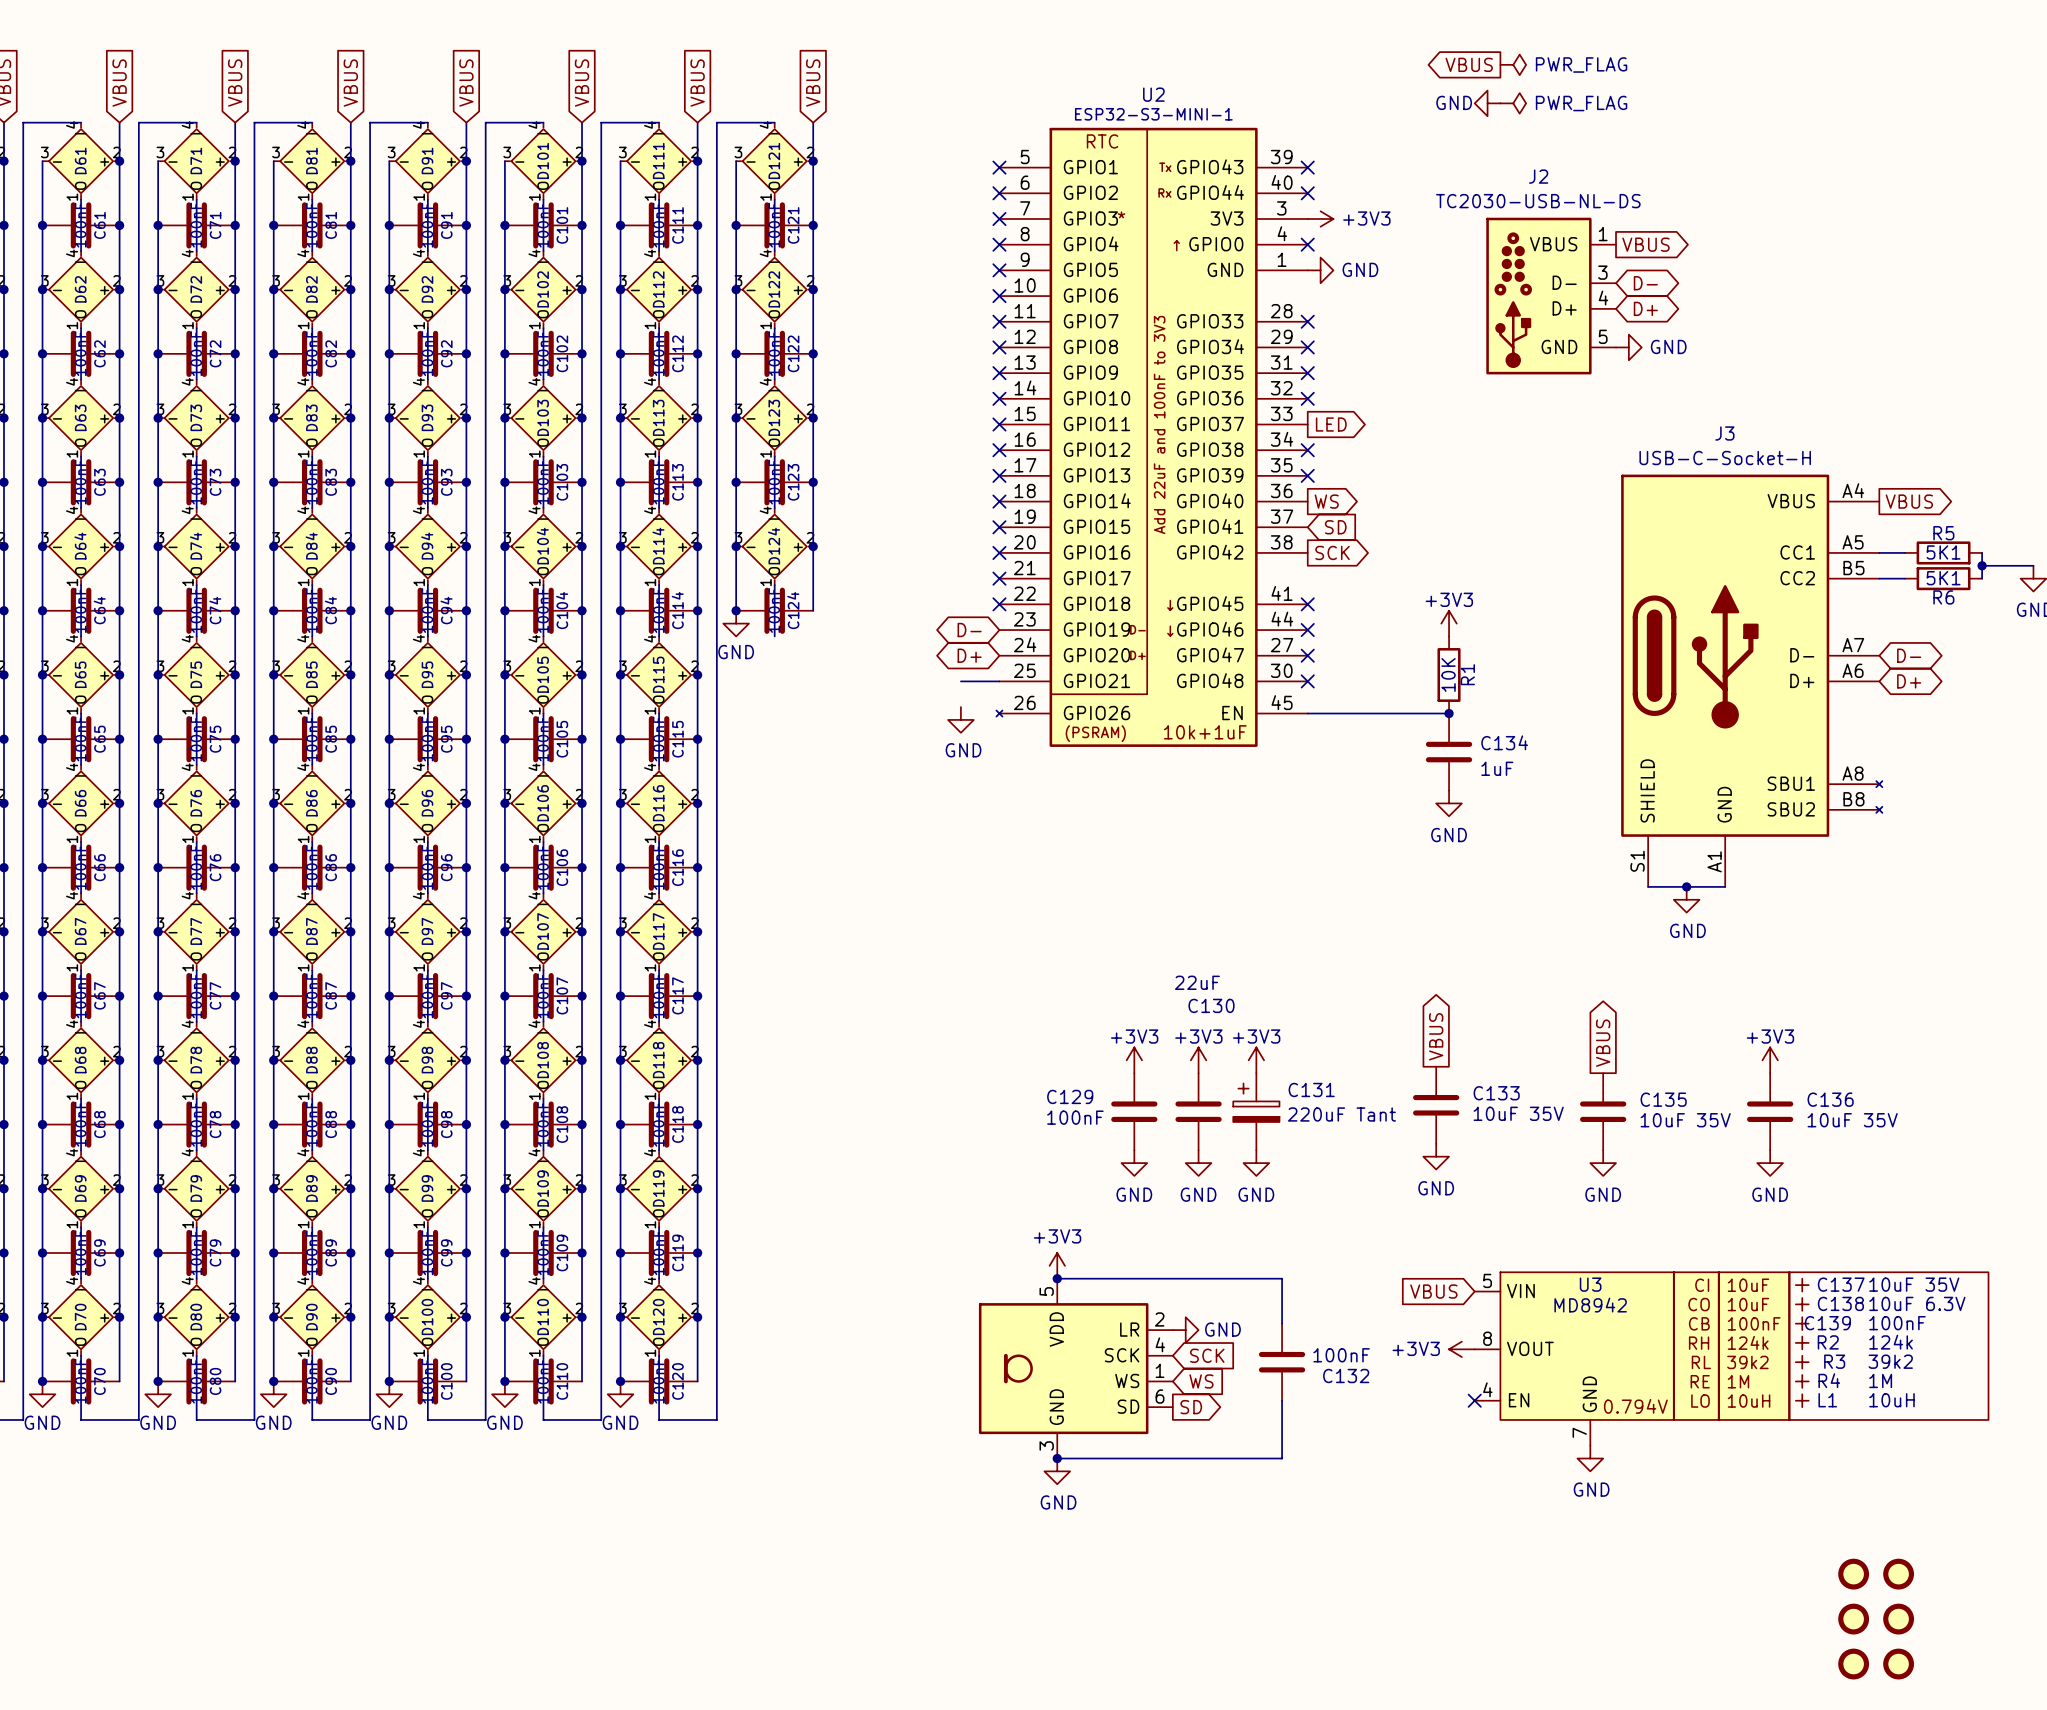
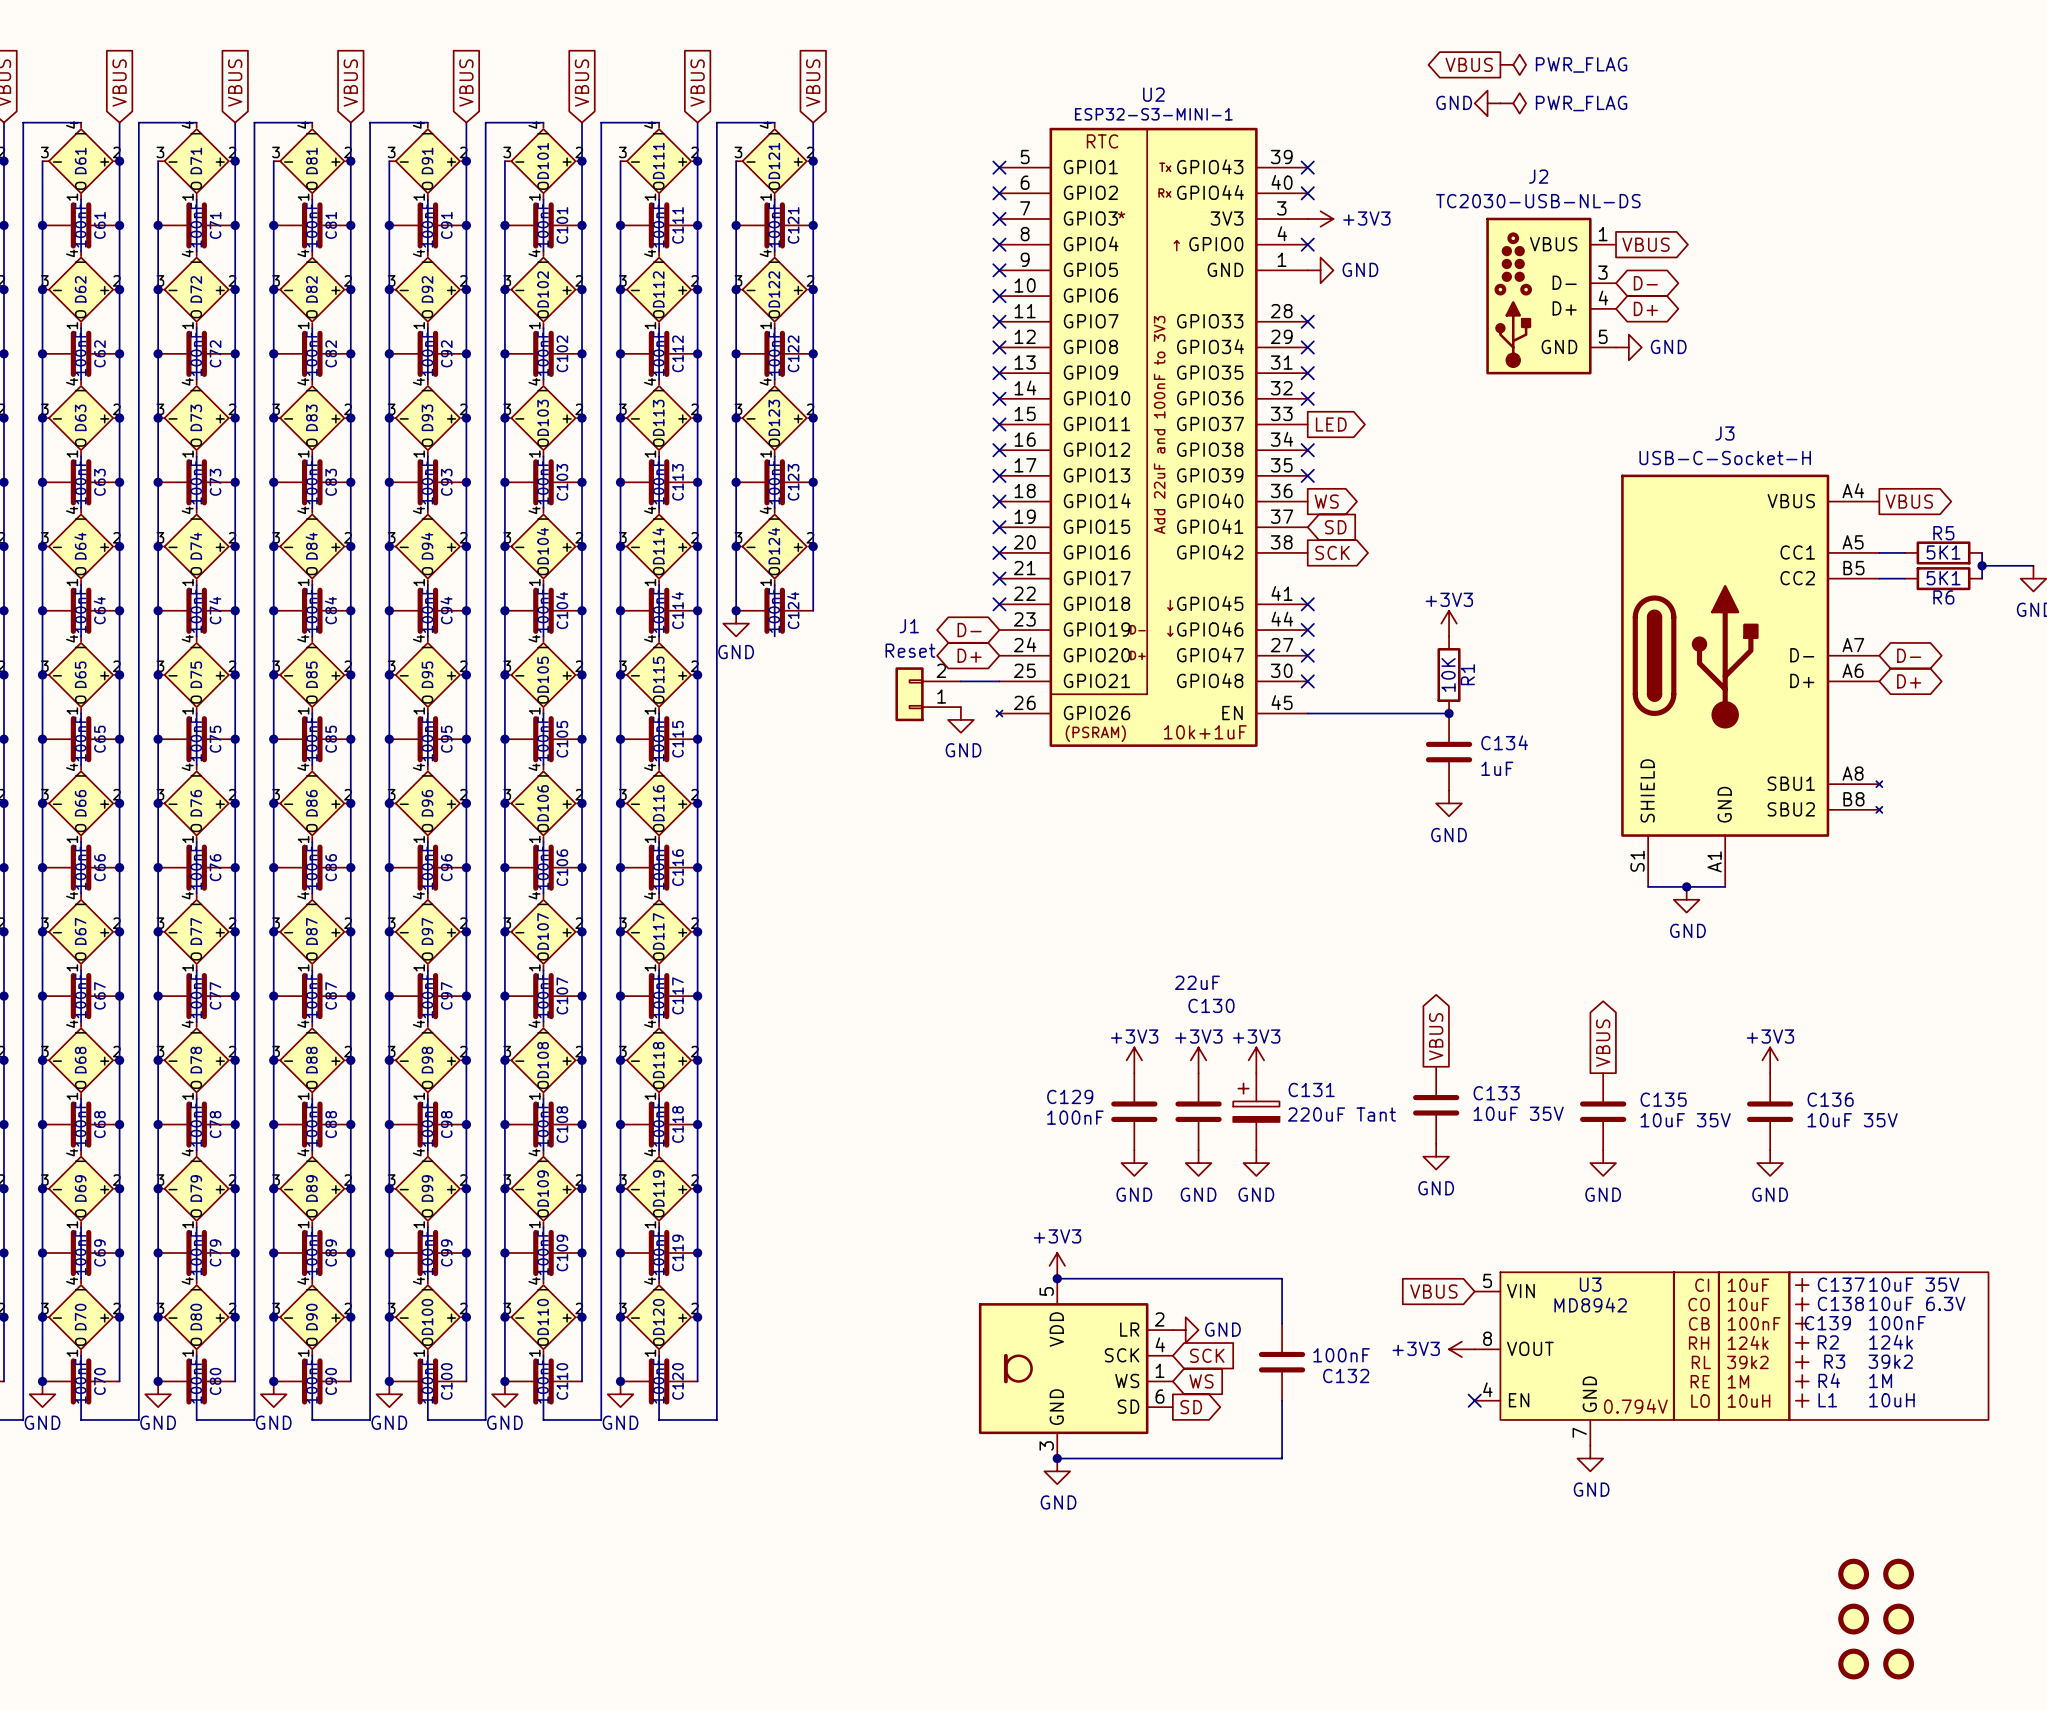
J1: none -> Reset (928, 694)

